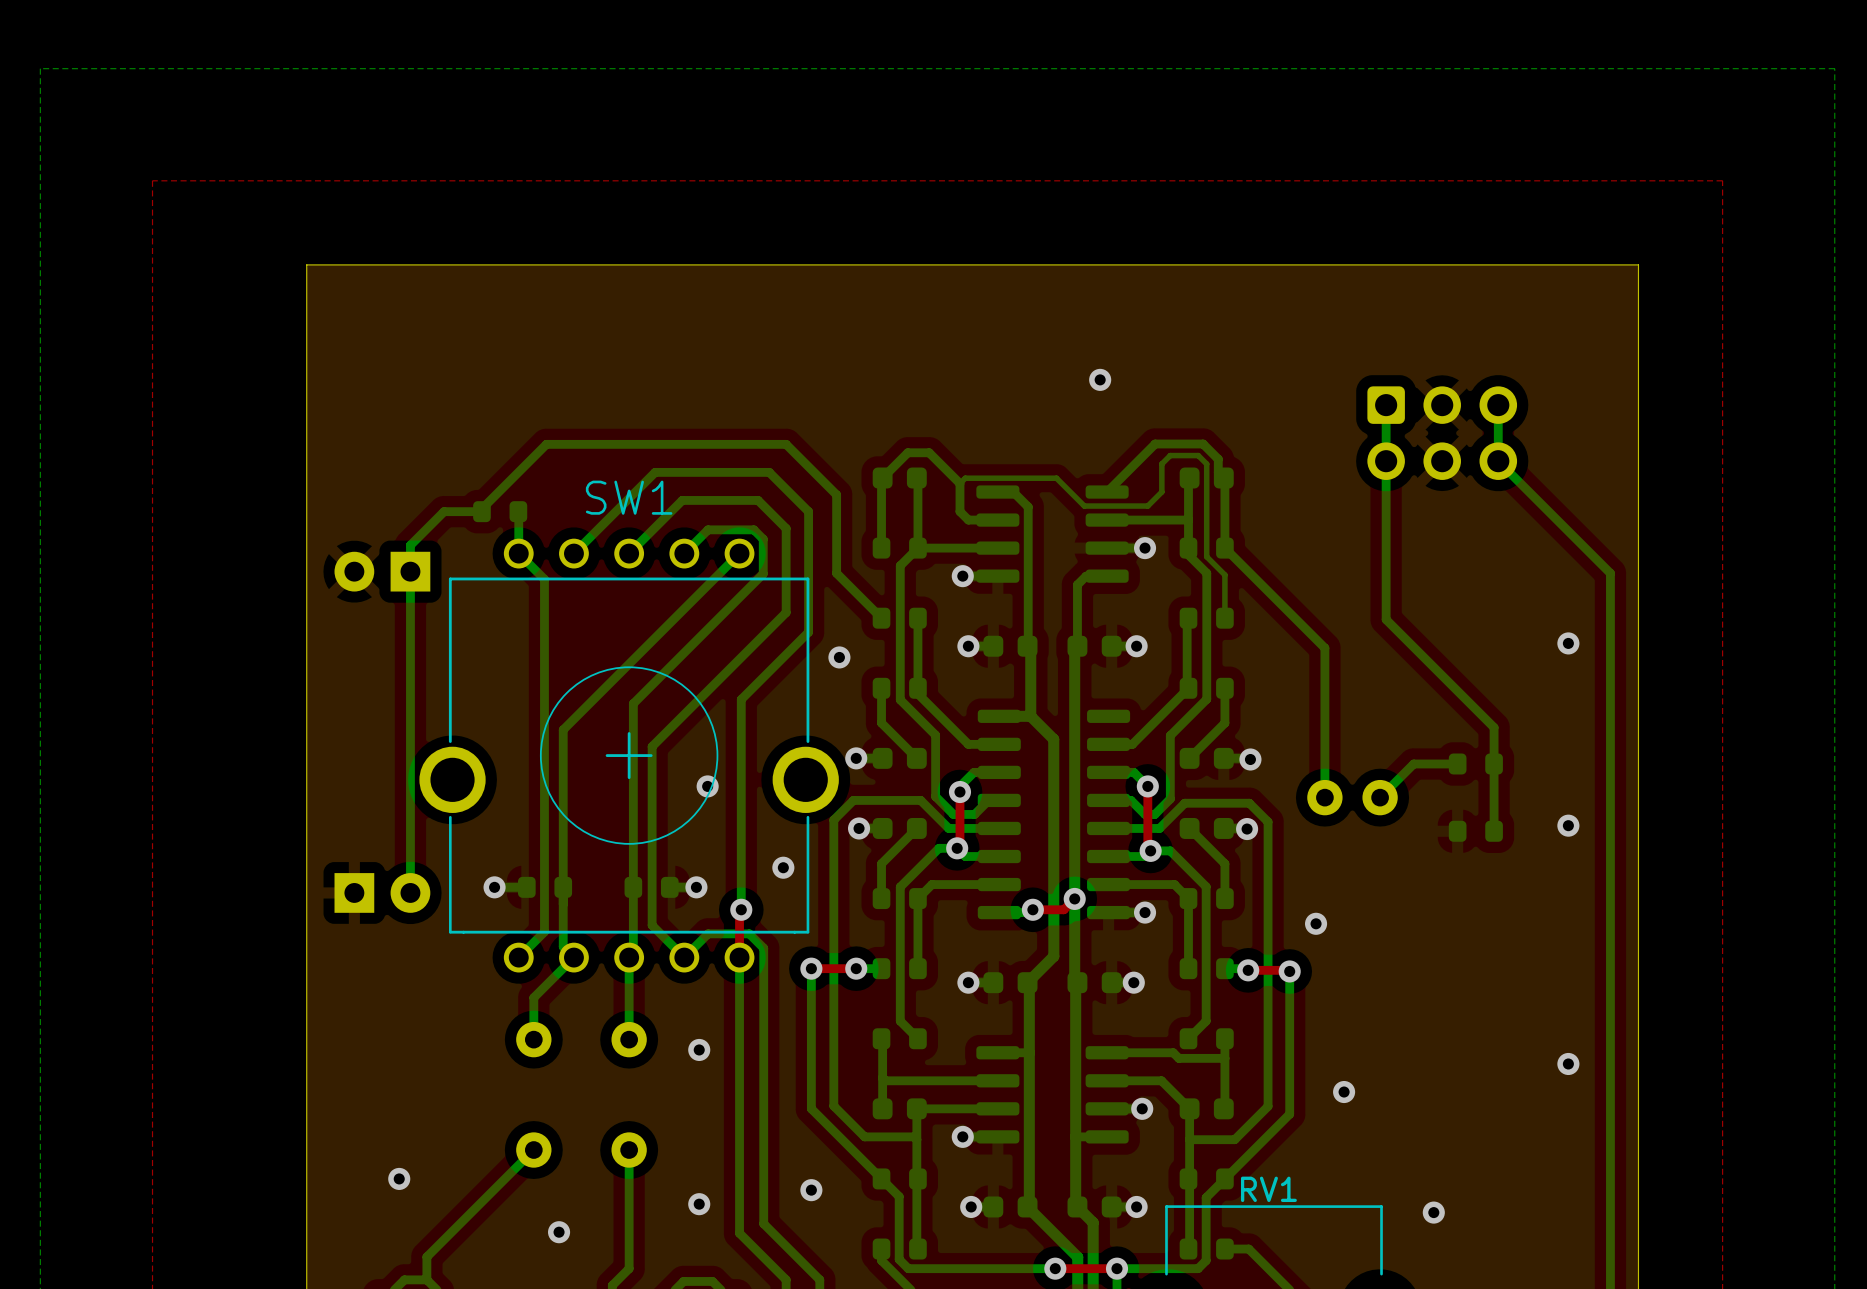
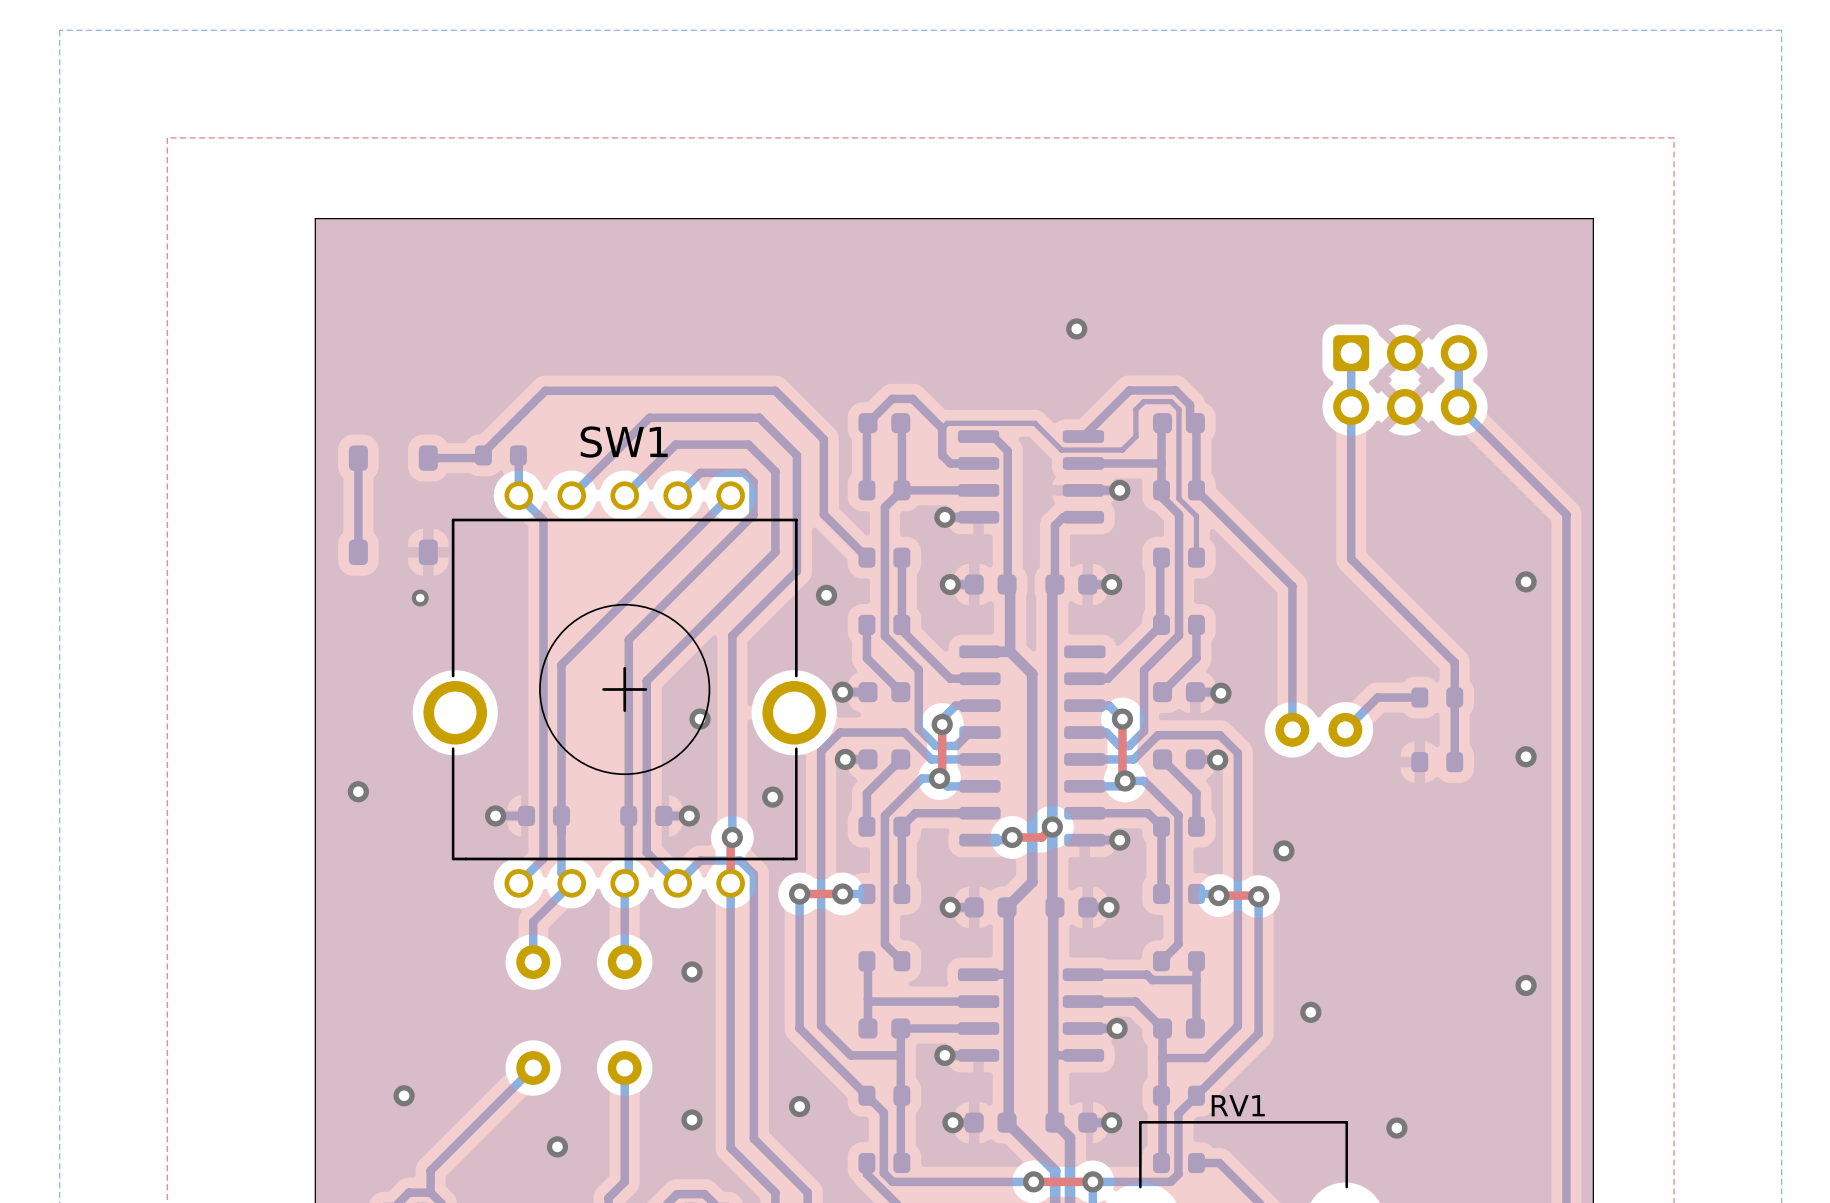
bottom track: (481, 511) (444, 511) (410, 545) (410, 892) -> (483, 455) (480, 458) (428, 458)
bottom track: none -> (358, 458) (358, 552)
part: none -> (393, 458)
part: (382, 571) -> none
part: none -> (393, 552)
via: none -> (420, 598)
via: none -> (358, 791)
part: (382, 892) -> none

